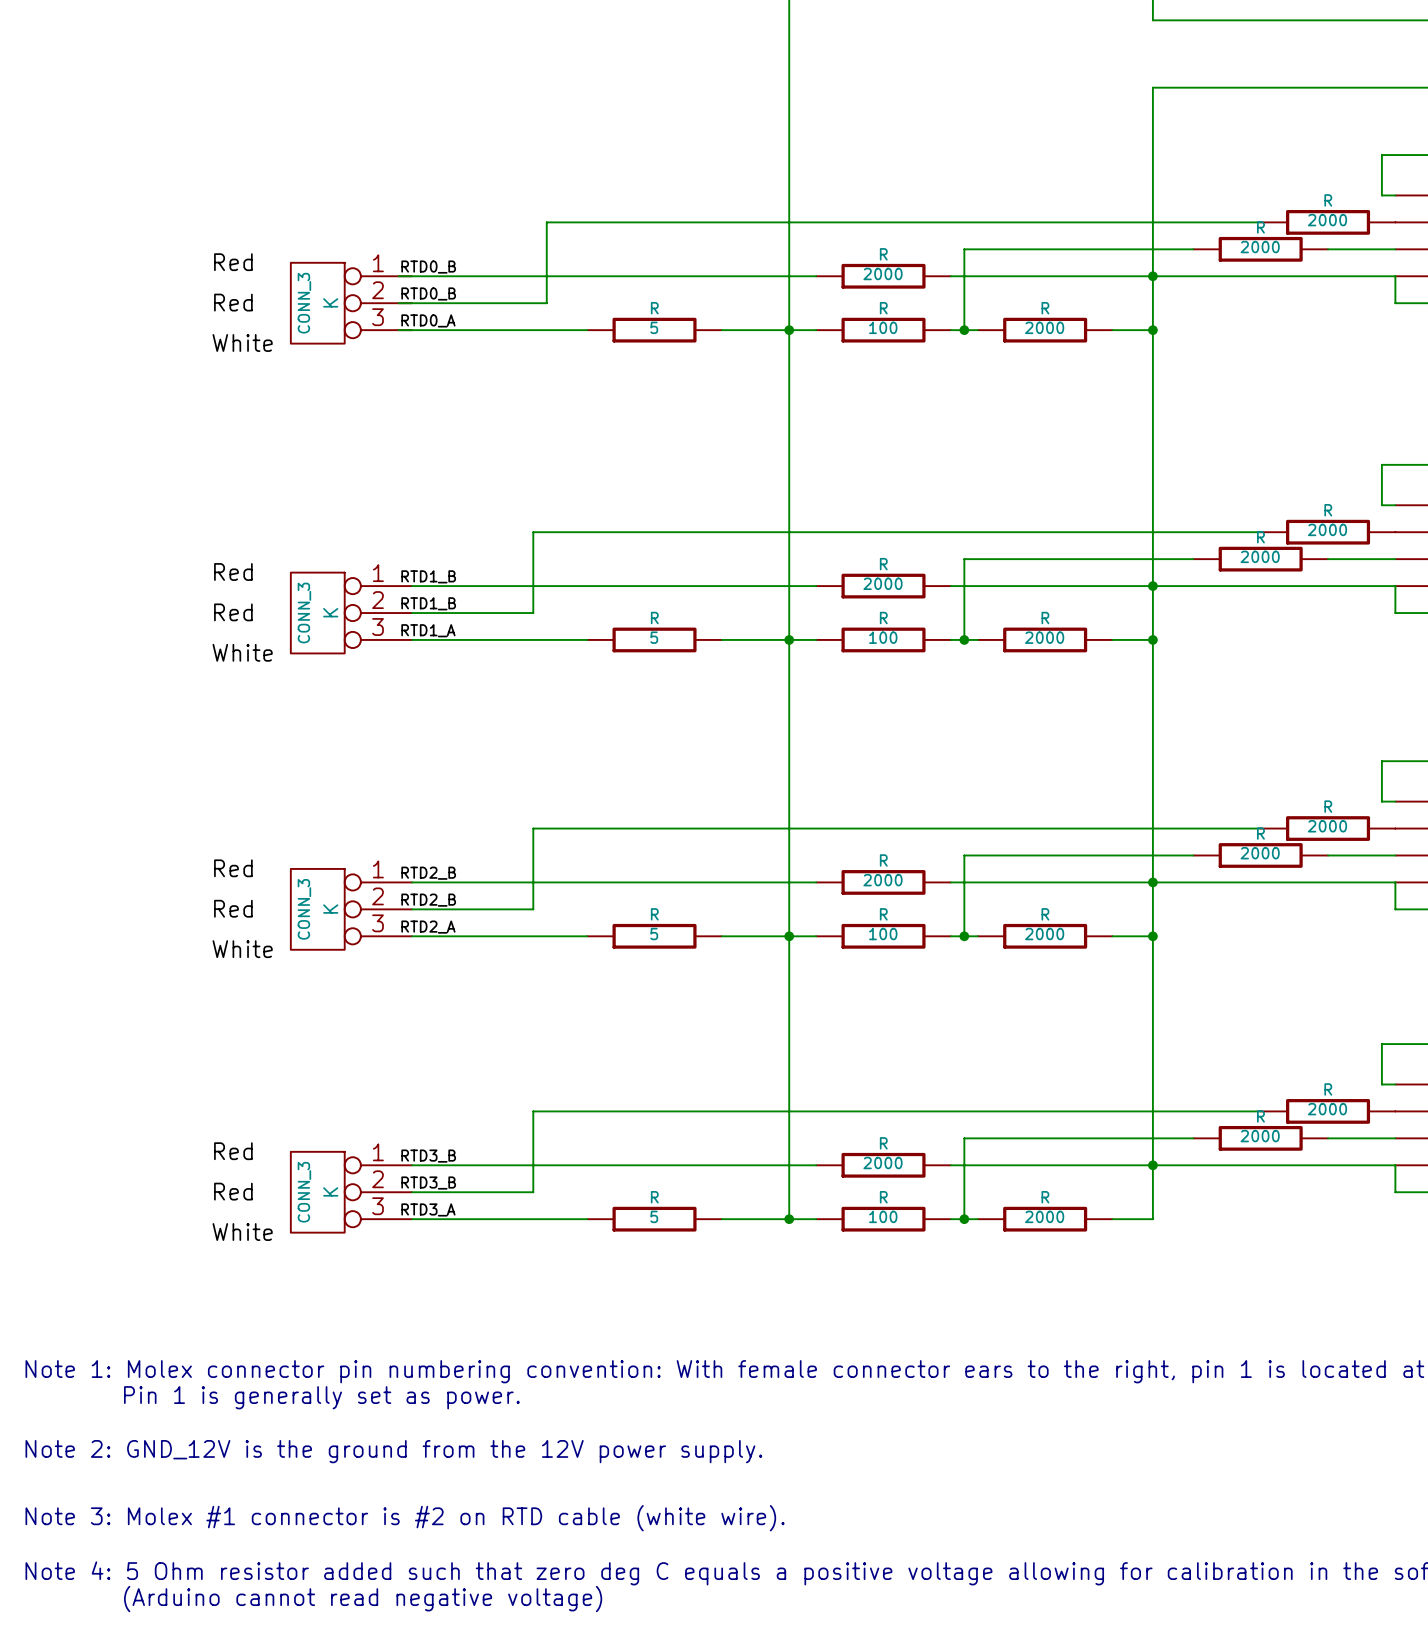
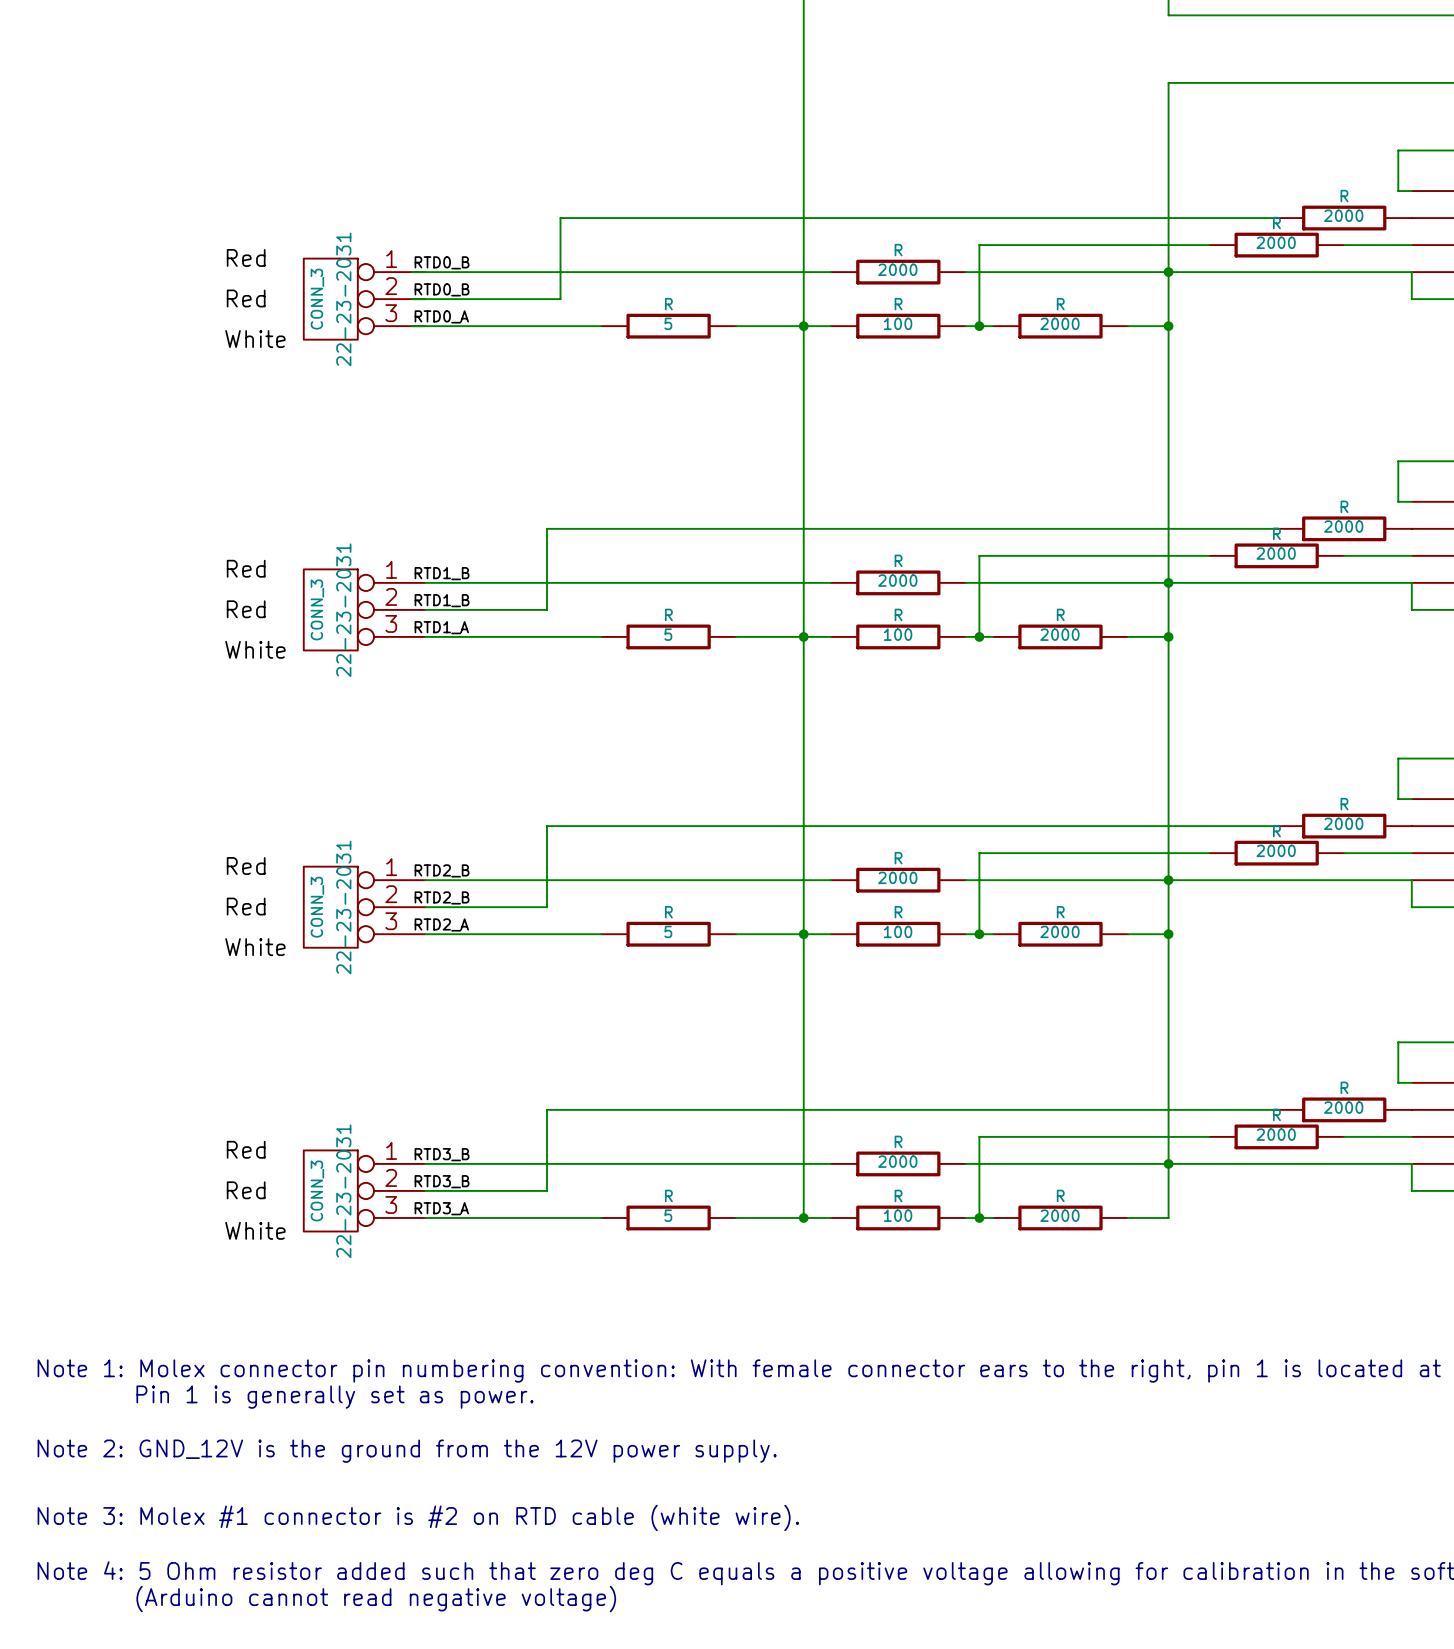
K name: K (330, 302) -> 22-23-2031 (343, 299)
K name: K (330, 612) -> 22-23-2031 (343, 610)
K name: K (330, 909) -> 22-23-2031 (343, 907)
K name: K (330, 1191) -> 22-23-2031 (343, 1191)

